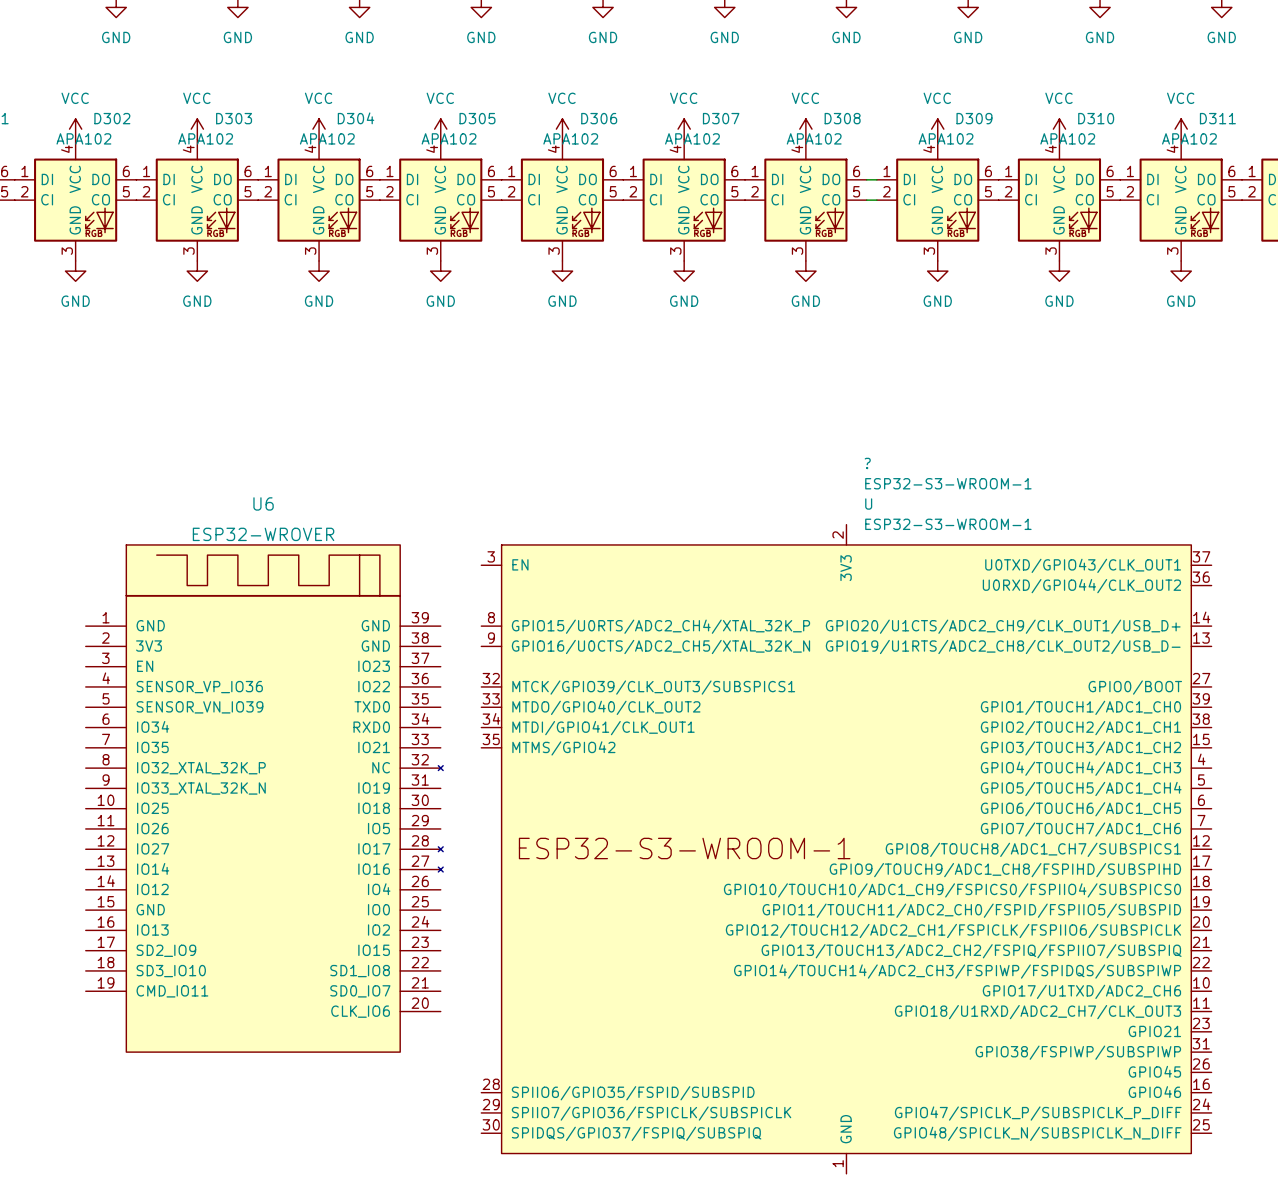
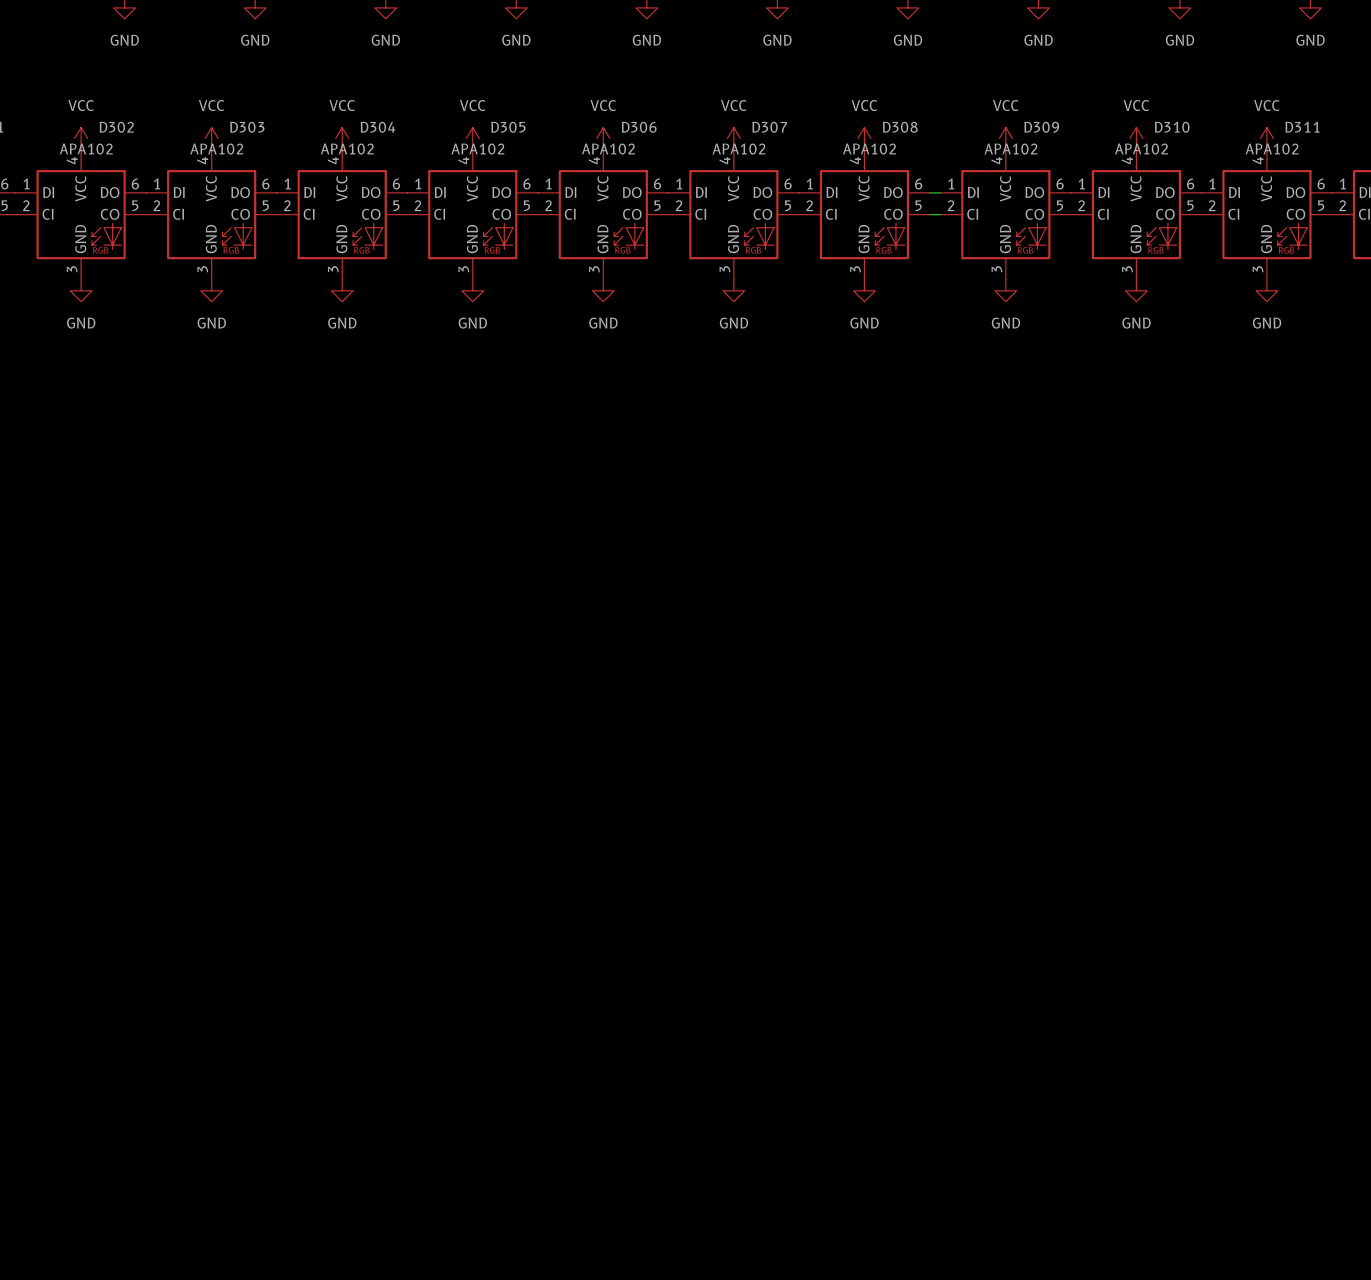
U6: ESP32-WROVER (264, 798) -> none
part: ESP32-S3-WROOM-1 (846, 849) -> none

